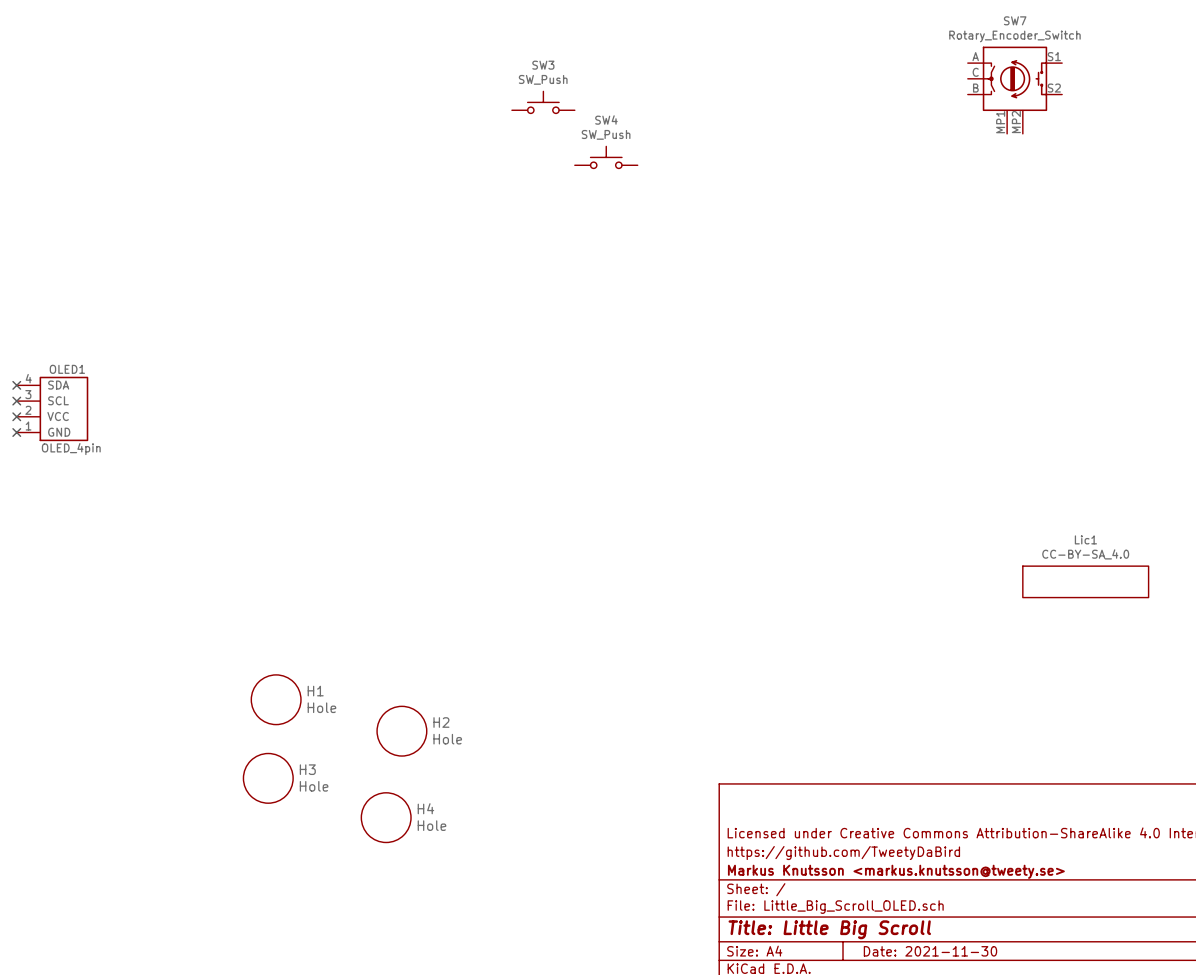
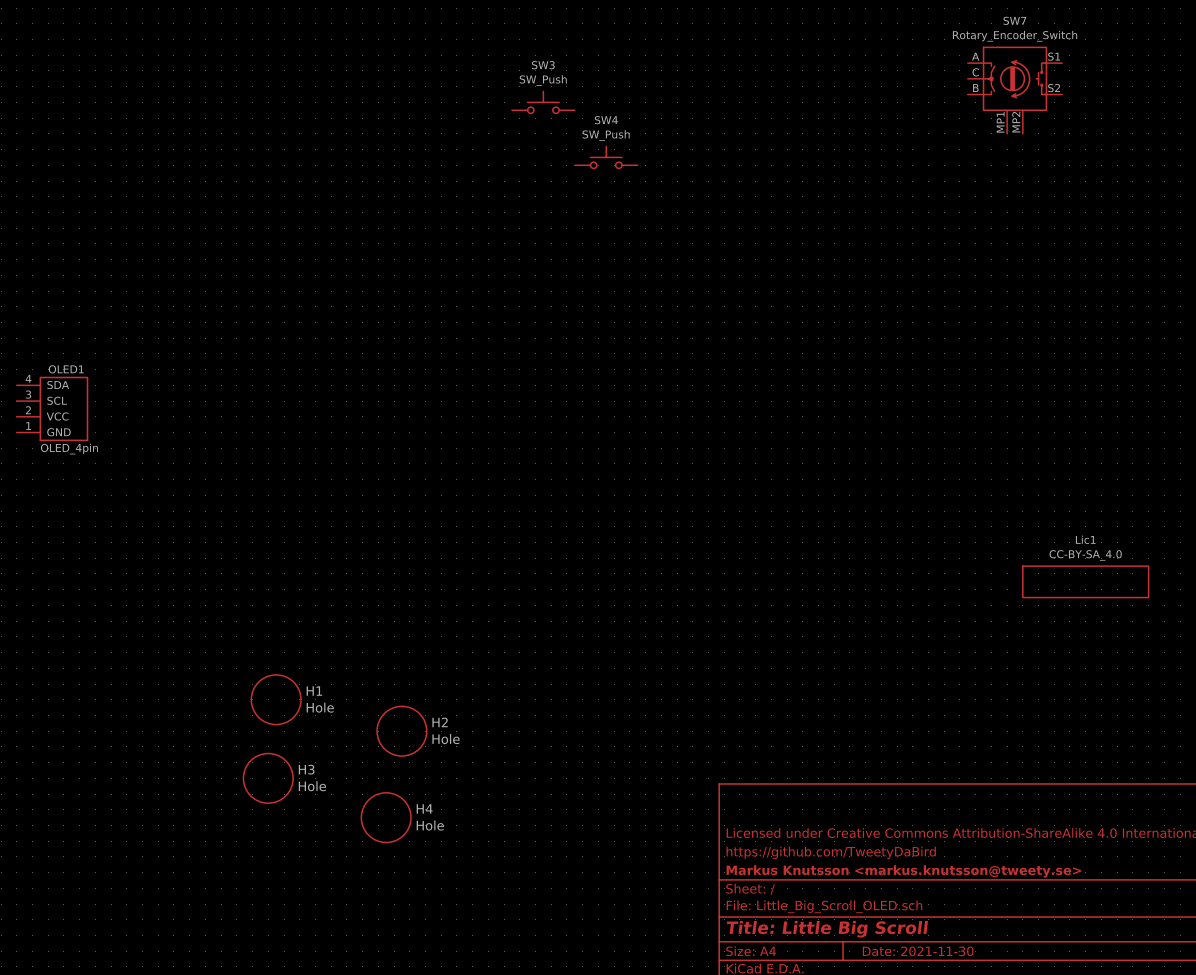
no-connect mark: (16, 385) -> none
no-connect mark: (16, 401) -> none
no-connect mark: (16, 416) -> none
no-connect mark: (16, 432) -> none

